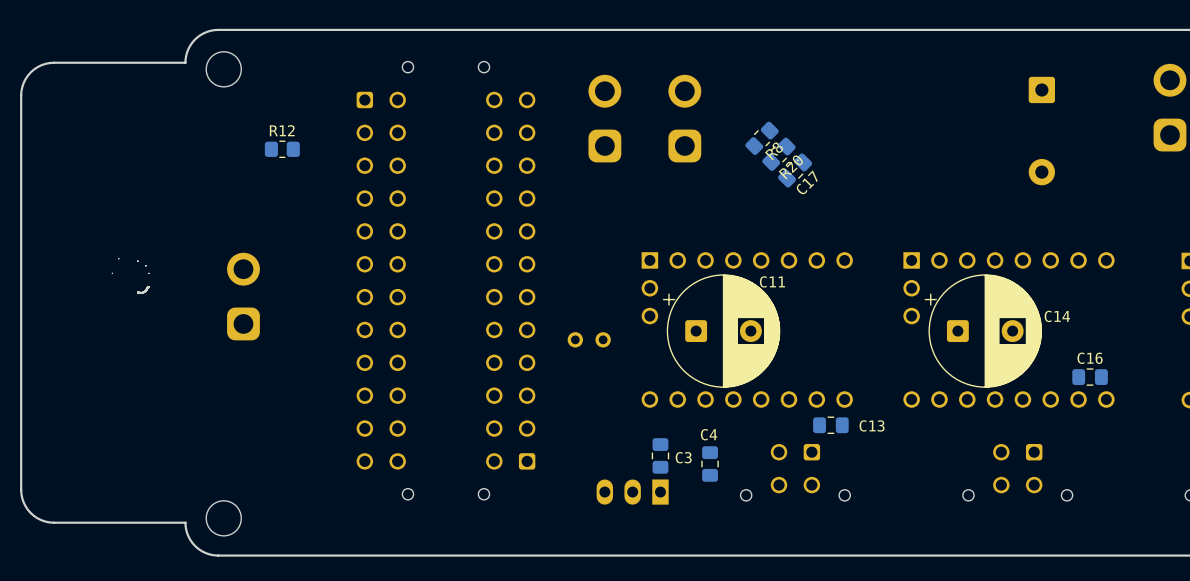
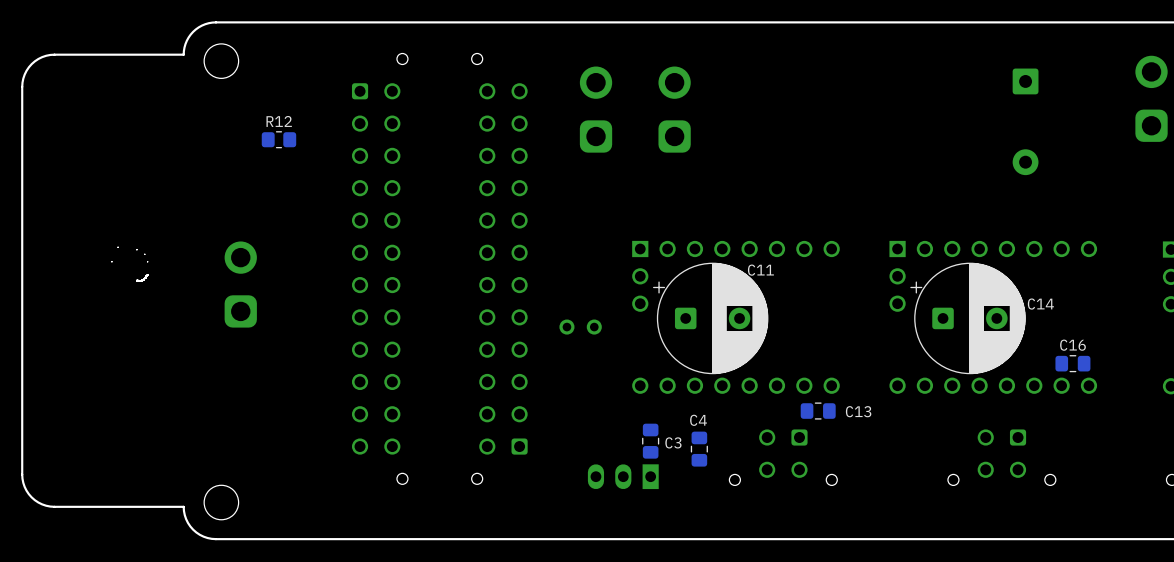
R8: (762, 138) -> none
R20: (778, 154) -> none
C17: (795, 170) -> none

